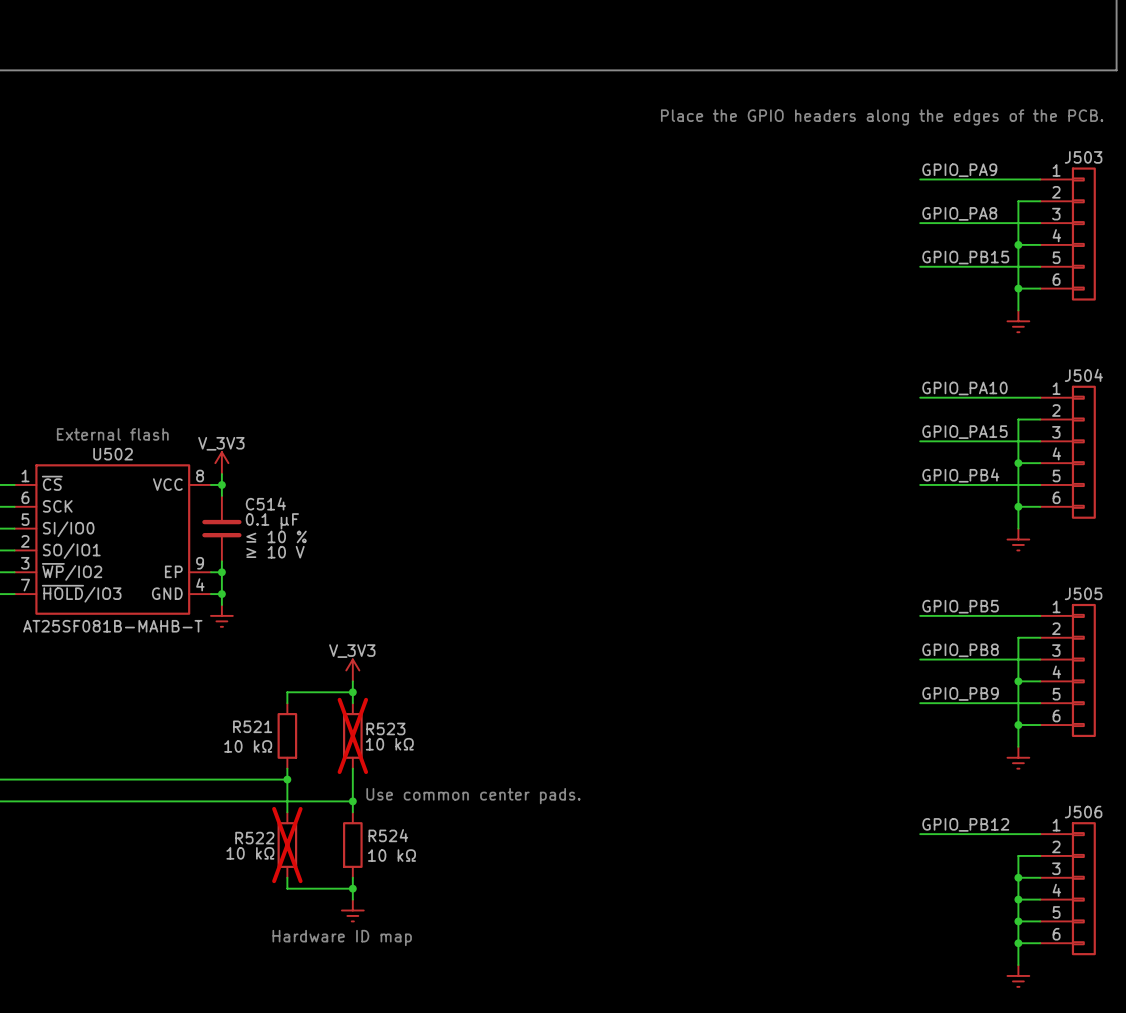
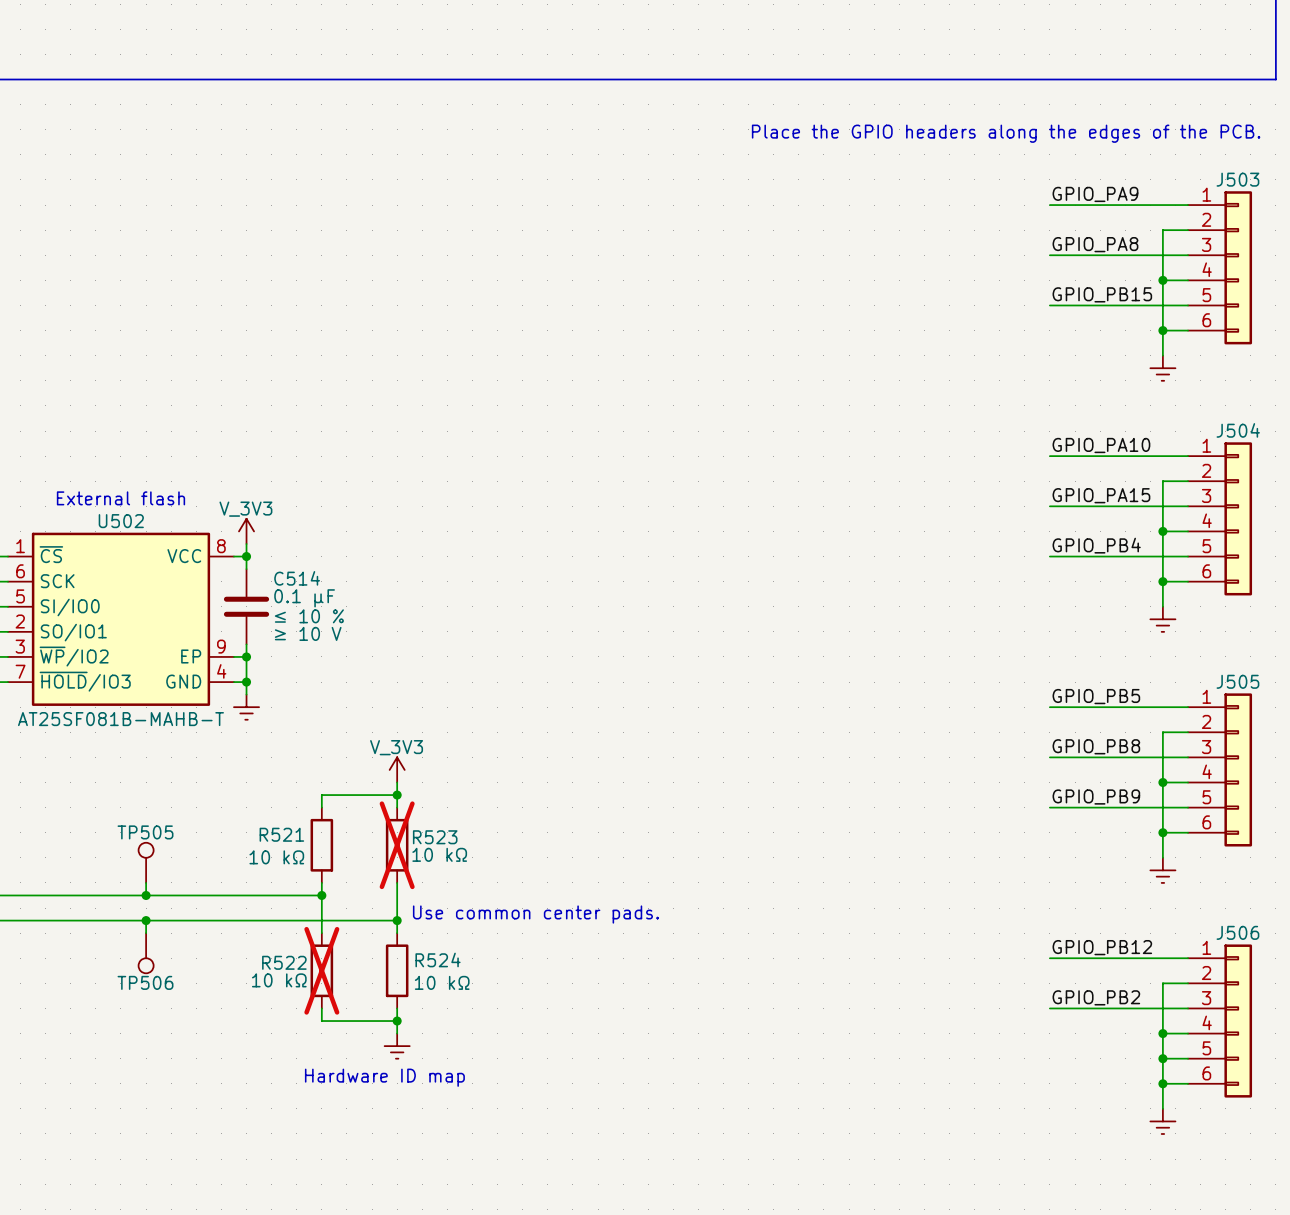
TP505: none -> (146, 862)
wire: none -> (146, 882) (146, 895)
junction: none -> (146, 895)
wire: none -> (146, 920) (146, 933)
junction: none -> (146, 920)
TP506: none -> (146, 953)
label: none -> GPIO_PB2 (1096, 997)
wire: none -> (1049, 1008) (1162, 1008)
junction: (1018, 877) -> none

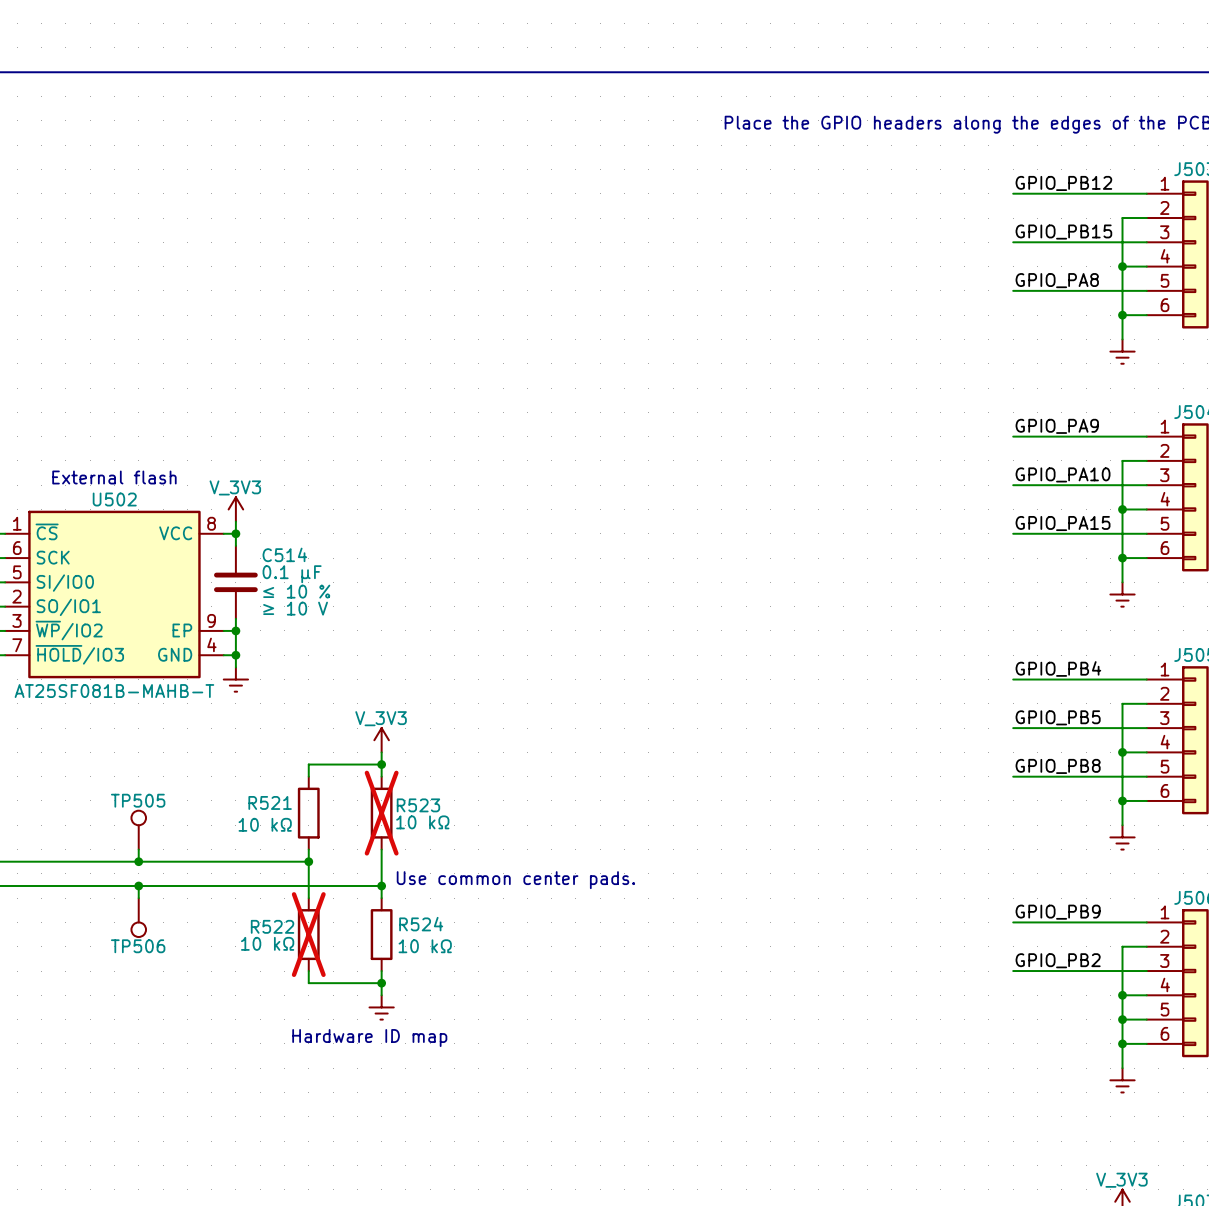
label: GPIO_PA9 (1095, 194) -> GPIO_PB12 (1063, 183)
label: GPIO_PA8 (1095, 244) -> GPIO_PB15 (1063, 232)
label: GPIO_PB15 (1102, 294) -> GPIO_PA8 (1057, 280)
label: GPIO_PA10 (1101, 445) -> GPIO_PA9 (1057, 426)
label: GPIO_PA15 (1101, 495) -> GPIO_PA10 (1063, 474)
label: GPIO_PB4 (1096, 545) -> GPIO_PA15 (1063, 523)
label: GPIO_PB5 (1096, 696) -> GPIO_PB4 (1058, 668)
label: GPIO_PB8 (1096, 746) -> GPIO_PB5 (1058, 717)
label: GPIO_PB9 (1096, 797) -> GPIO_PB8 (1058, 766)
label: GPIO_PB12 (1102, 947) -> GPIO_PB9 (1058, 912)

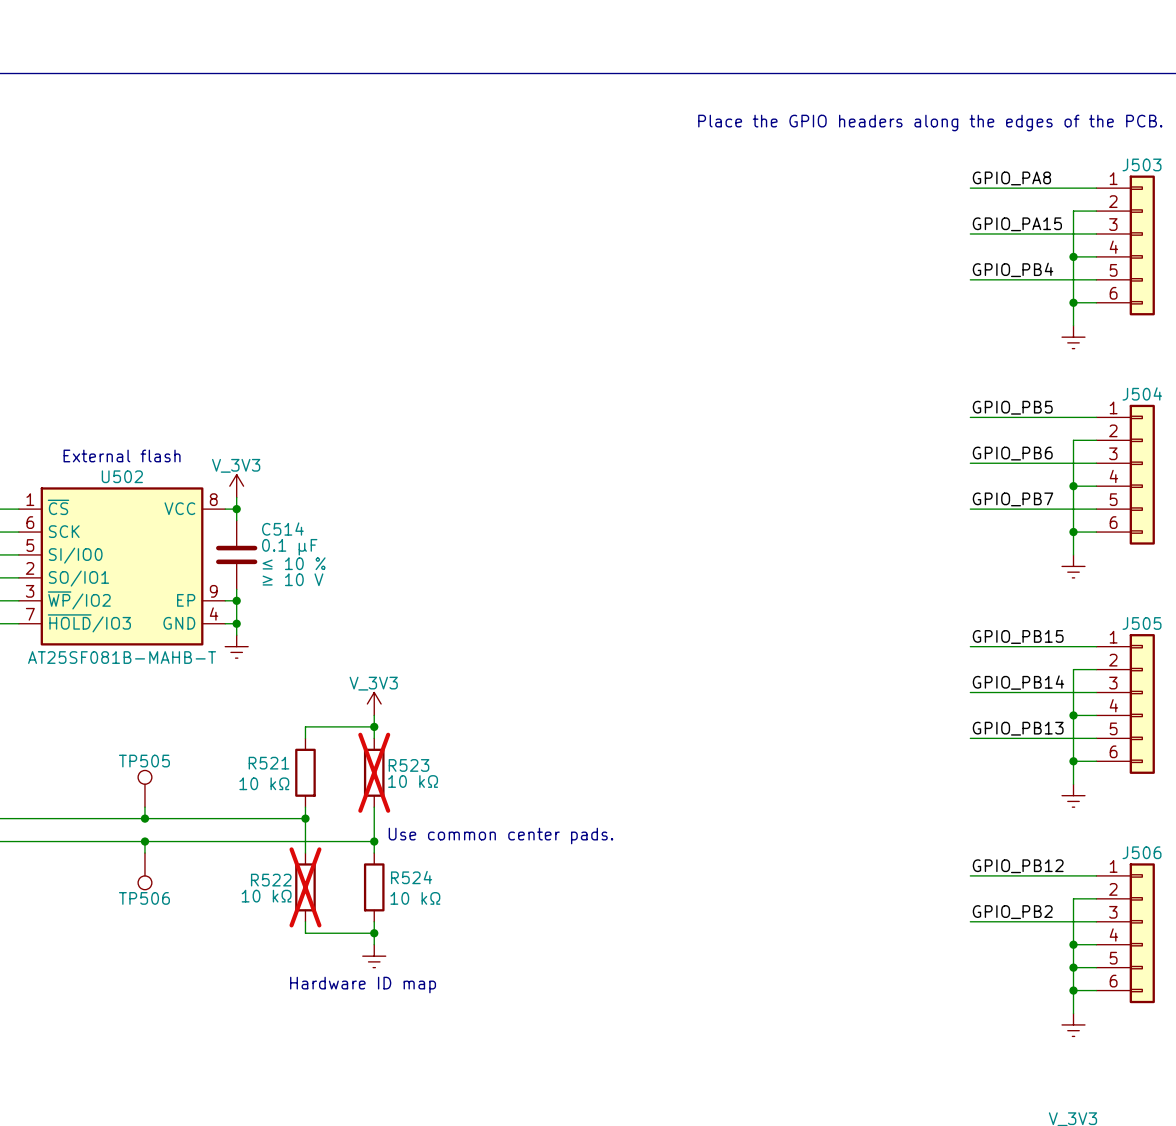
label: GPIO_PB12 (1063, 183) -> GPIO_PA8 (1011, 178)
label: GPIO_PB15 (1063, 232) -> GPIO_PA15 (1017, 224)
label: GPIO_PA8 (1057, 280) -> GPIO_PB4 (1013, 269)
label: GPIO_PA9 (1057, 426) -> GPIO_PB5 (1012, 407)
label: GPIO_PA10 (1063, 474) -> GPIO_PB6 (1012, 453)
label: GPIO_PA15 (1063, 523) -> GPIO_PB7 (1013, 499)
label: GPIO_PB4 (1058, 668) -> GPIO_PB15 (1018, 636)
label: GPIO_PB5 (1058, 717) -> GPIO_PB14 (1018, 682)
label: GPIO_PB8 (1058, 766) -> GPIO_PB13 (1018, 728)
label: GPIO_PB9 (1058, 912) -> GPIO_PB12 (1018, 866)

